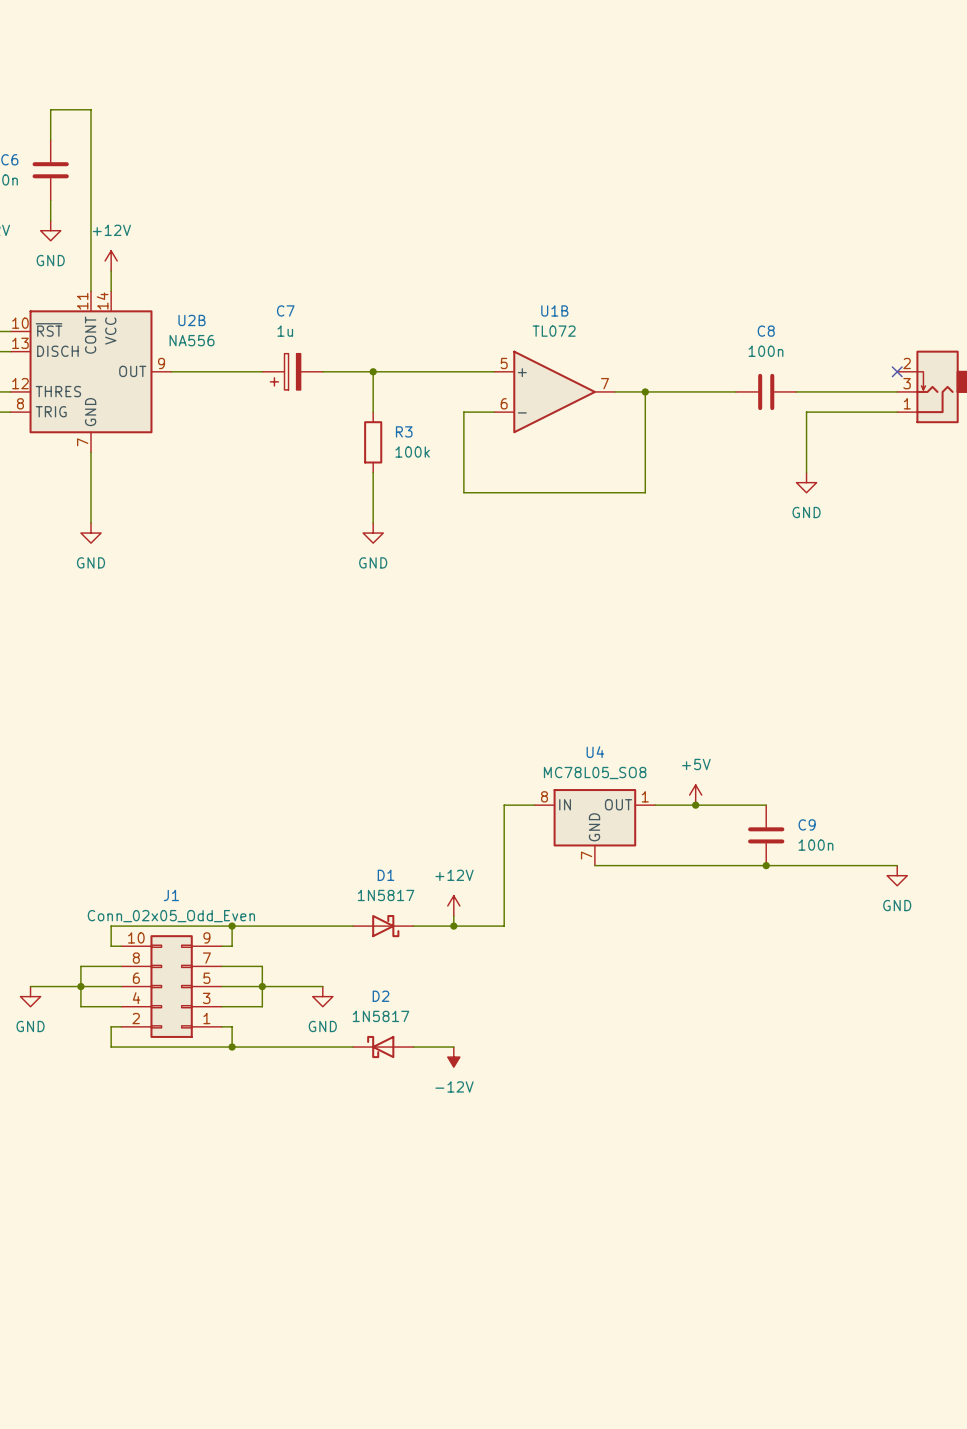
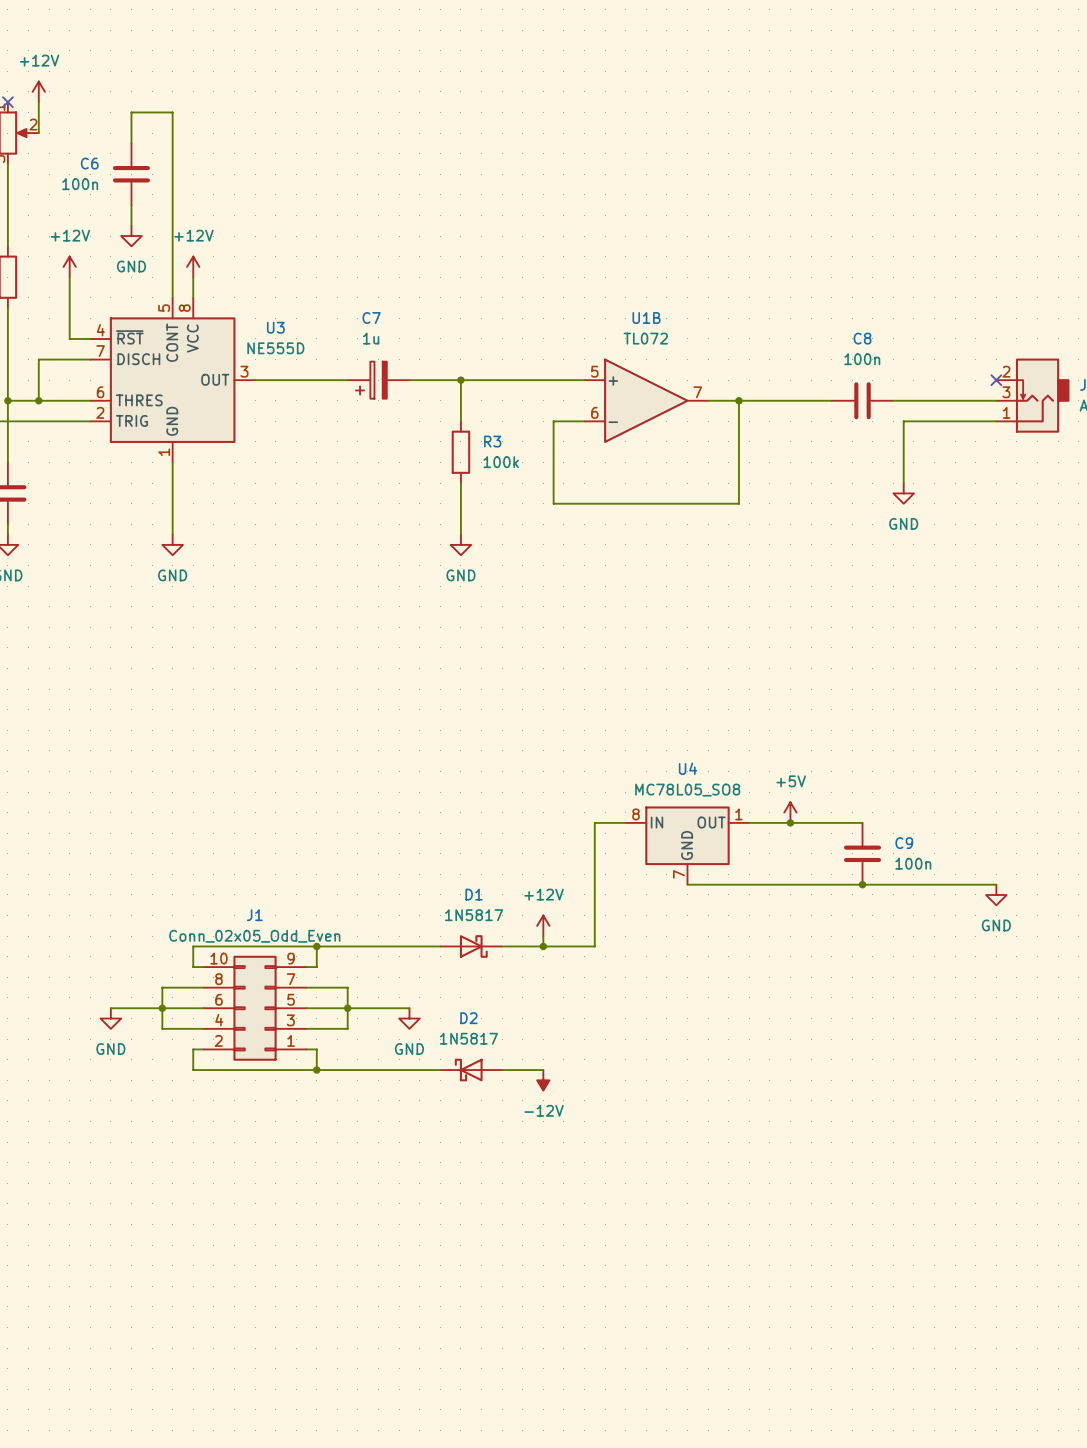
U2B pin number: 11 (82, 301) -> 5 (164, 308)
U2B pin number: 14 (102, 301) -> 8 (184, 308)
U2B name: U2B (192, 320) -> U3 (275, 327)
U2B pin number: 10 (20, 323) -> 4 (100, 330)
U2B value: NA556 (192, 340) -> NE555D (275, 348)
U2B pin number: 13 (20, 343) -> 7 (100, 351)
U2B pin number: 9 (161, 363) -> 3 (244, 371)
U2B pin number: 12 (20, 383) -> 6 (100, 392)
U2B pin number: 8 (20, 403) -> 2 (100, 412)
U2B pin number: 7 (82, 442) -> 1 (164, 452)

